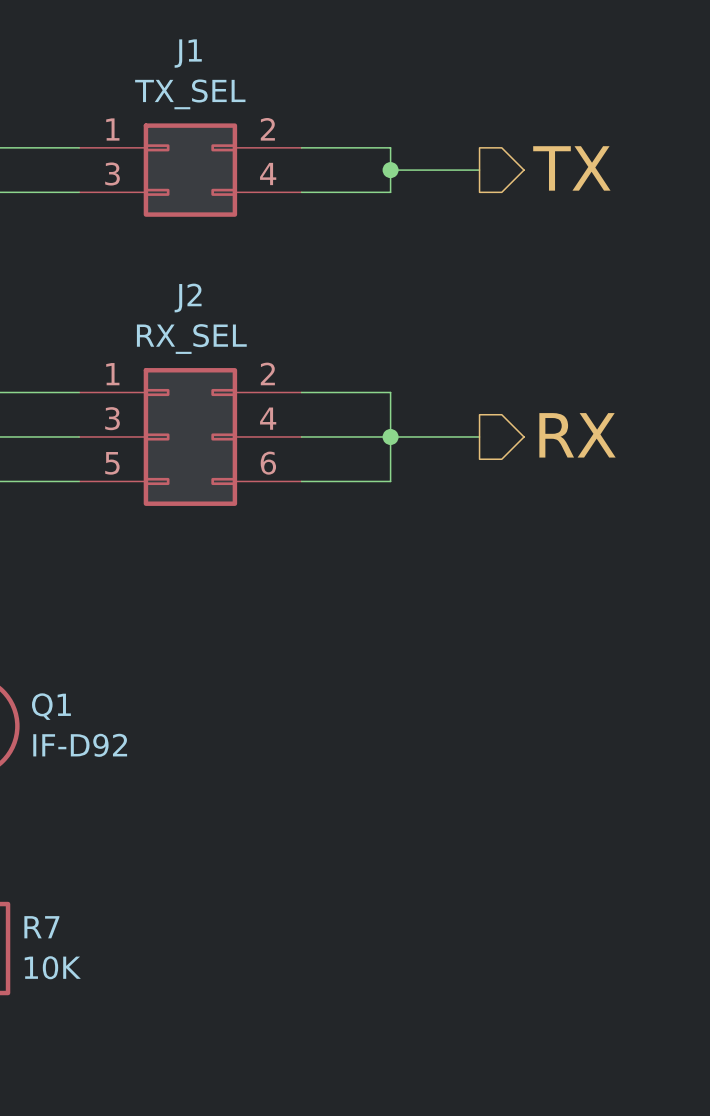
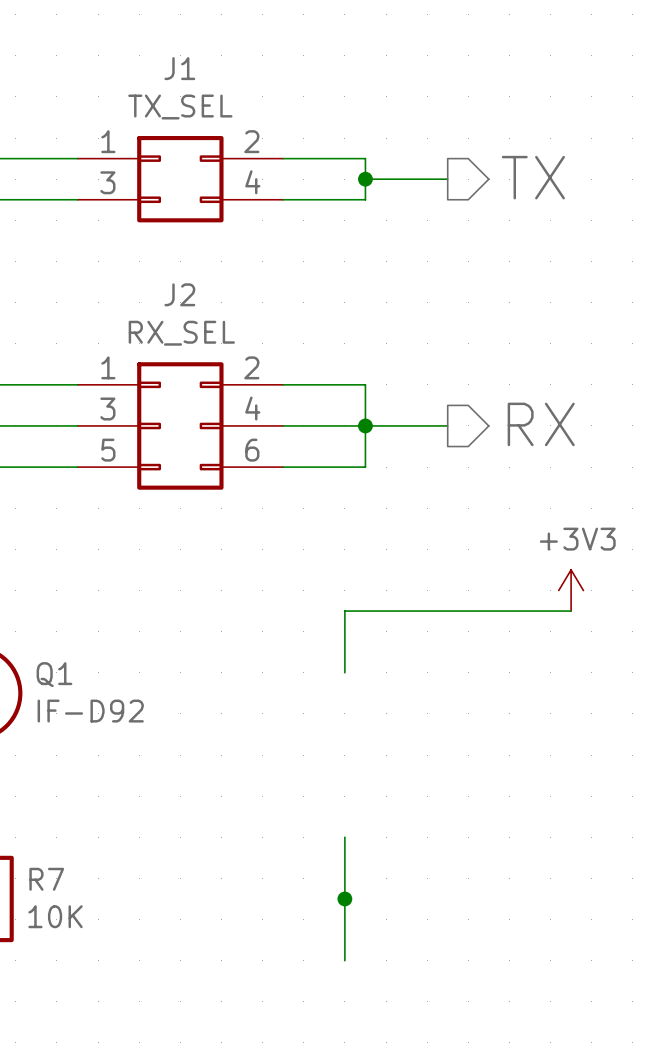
power symbol: none -> +3V3 (571, 590)
wire: none -> (571, 611) (344, 611) (344, 672)
wire: none -> (344, 837) (344, 960)
junction: none -> (344, 898)

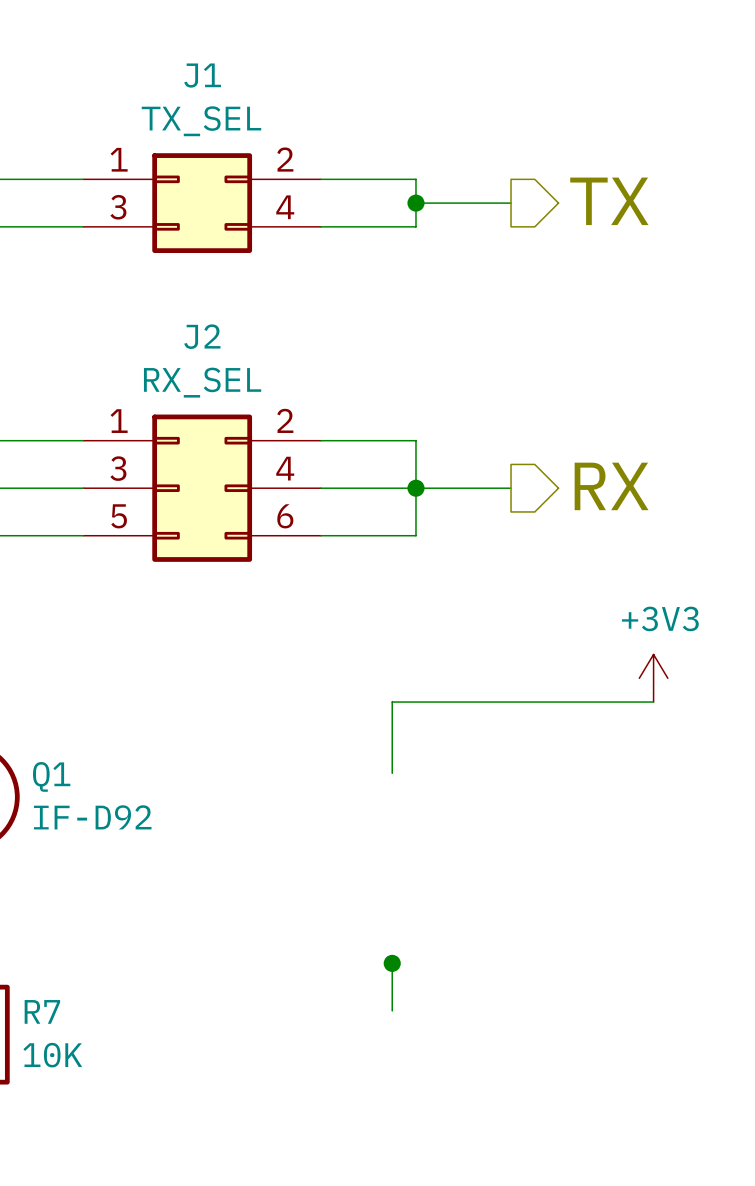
wire: (344, 878) (344, 960) -> none
junction position: (344, 898) -> (392, 963)

